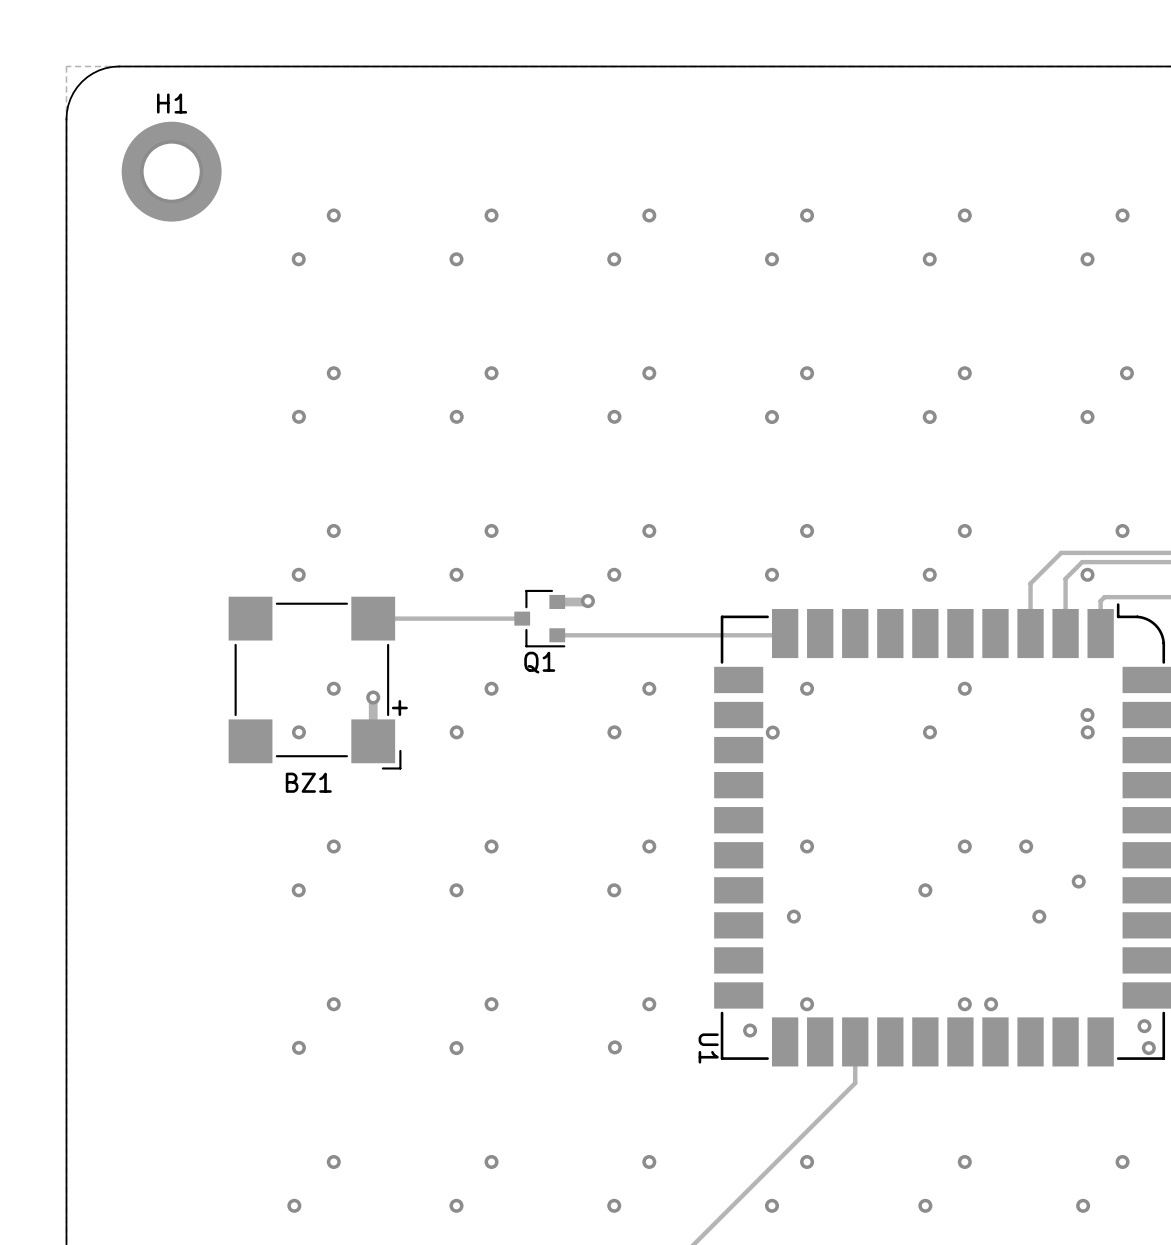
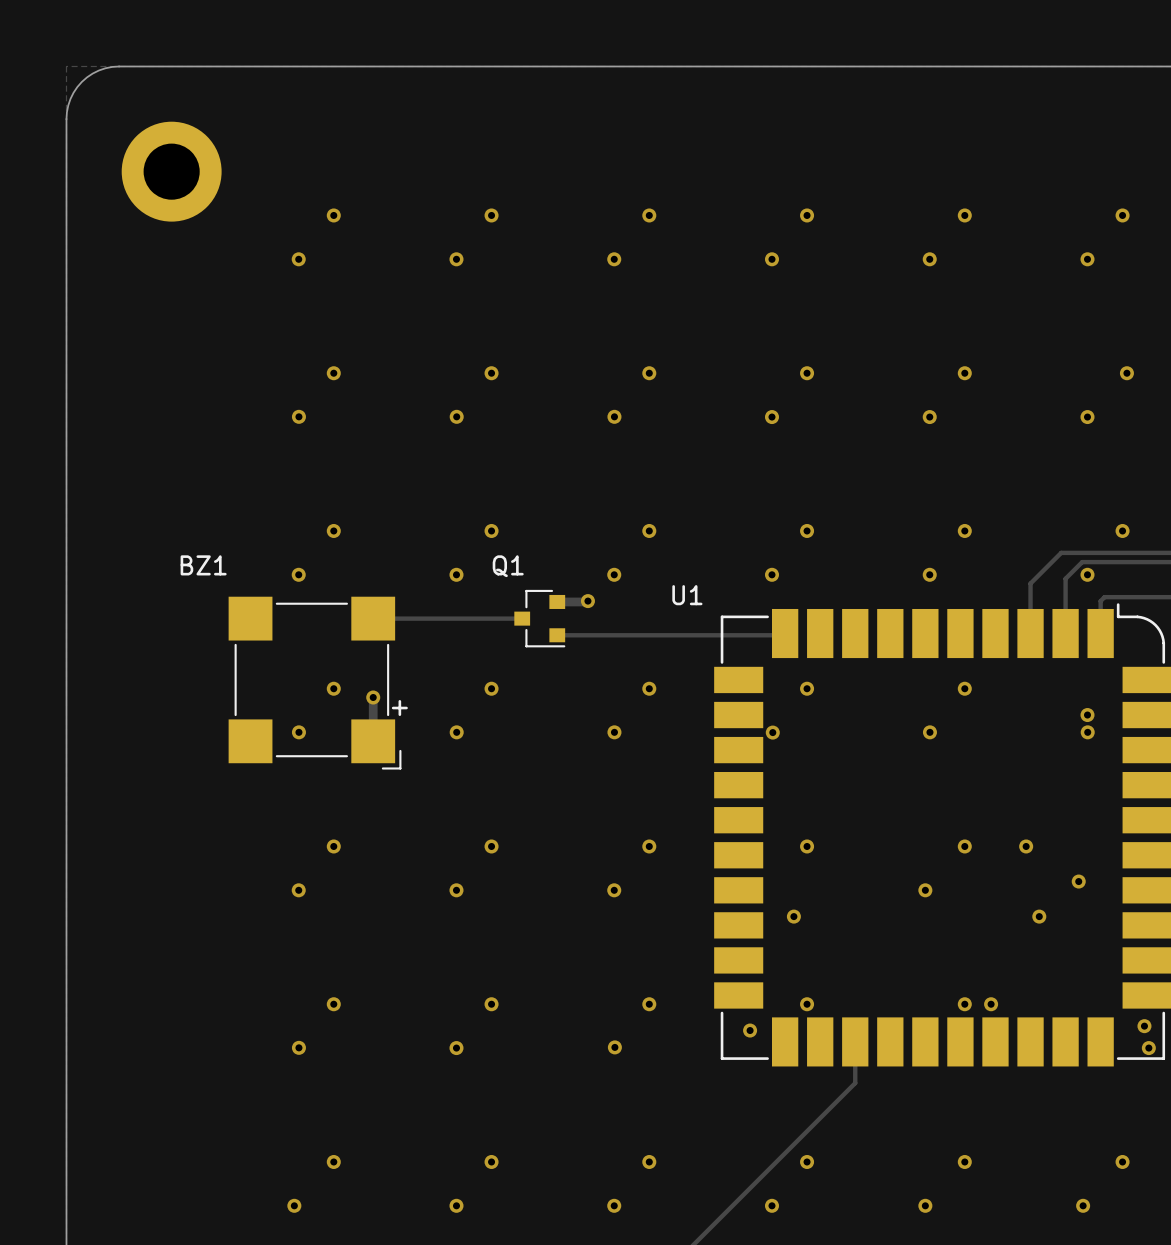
H1 name: H1 (172, 103) -> none
Q1 name position: Q1 (539, 662) -> Q1 (508, 566)
BZ1 name position: BZ1 (308, 782) -> BZ1 (203, 565)
U1 name rotation: 0° (708, 1048) -> 90° counterclockwise (687, 595)
U1 name position: U1 (708, 1048) -> U1 (687, 595)

